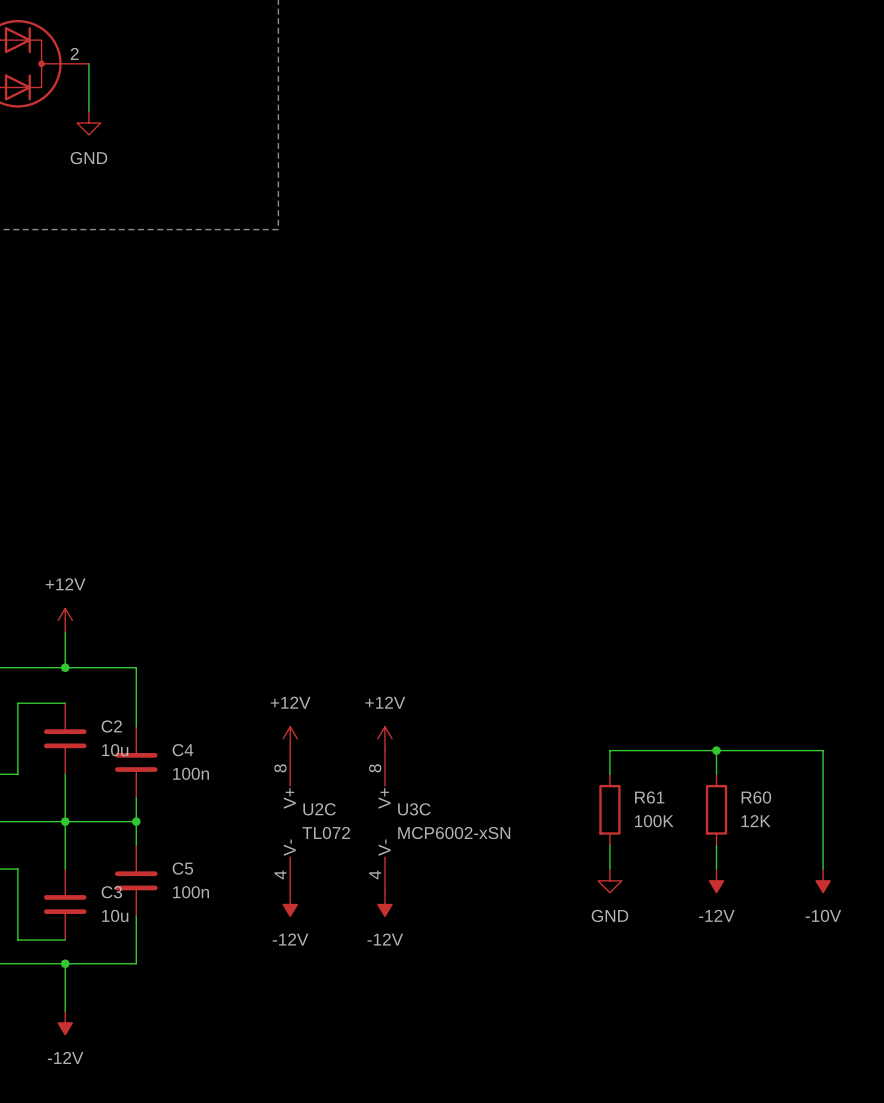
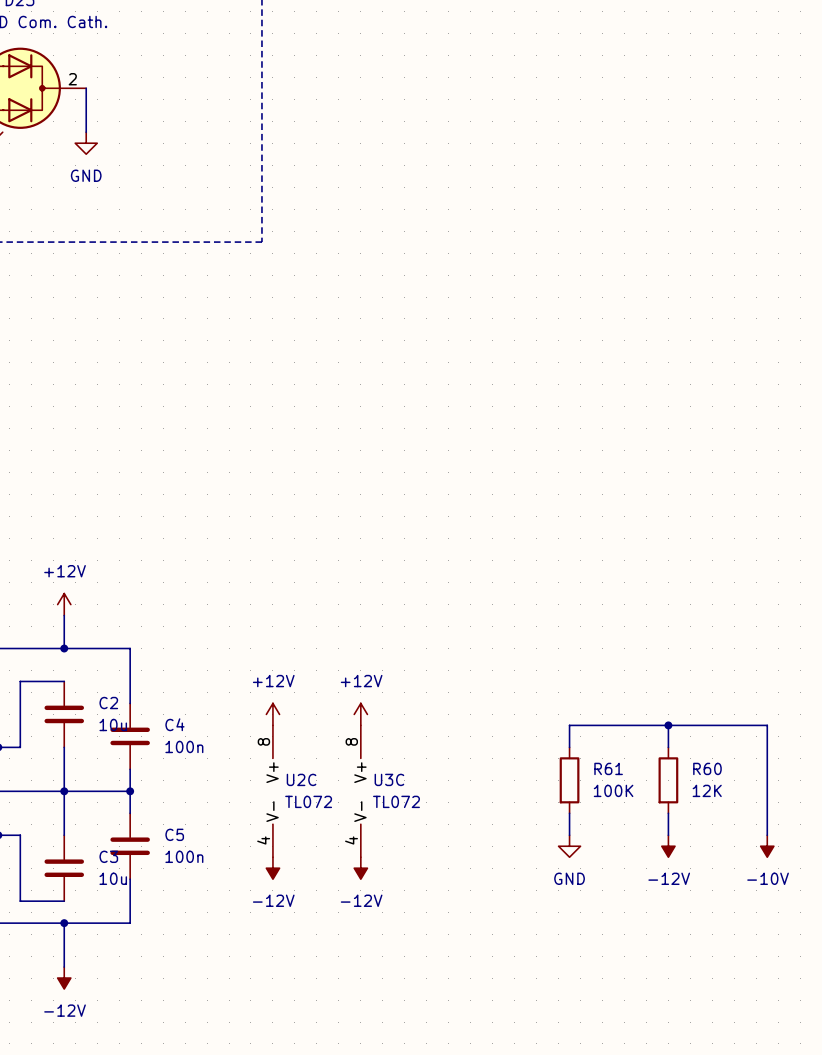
U3C value: MCP6002-xSN (454, 833) -> TL072 (396, 801)

